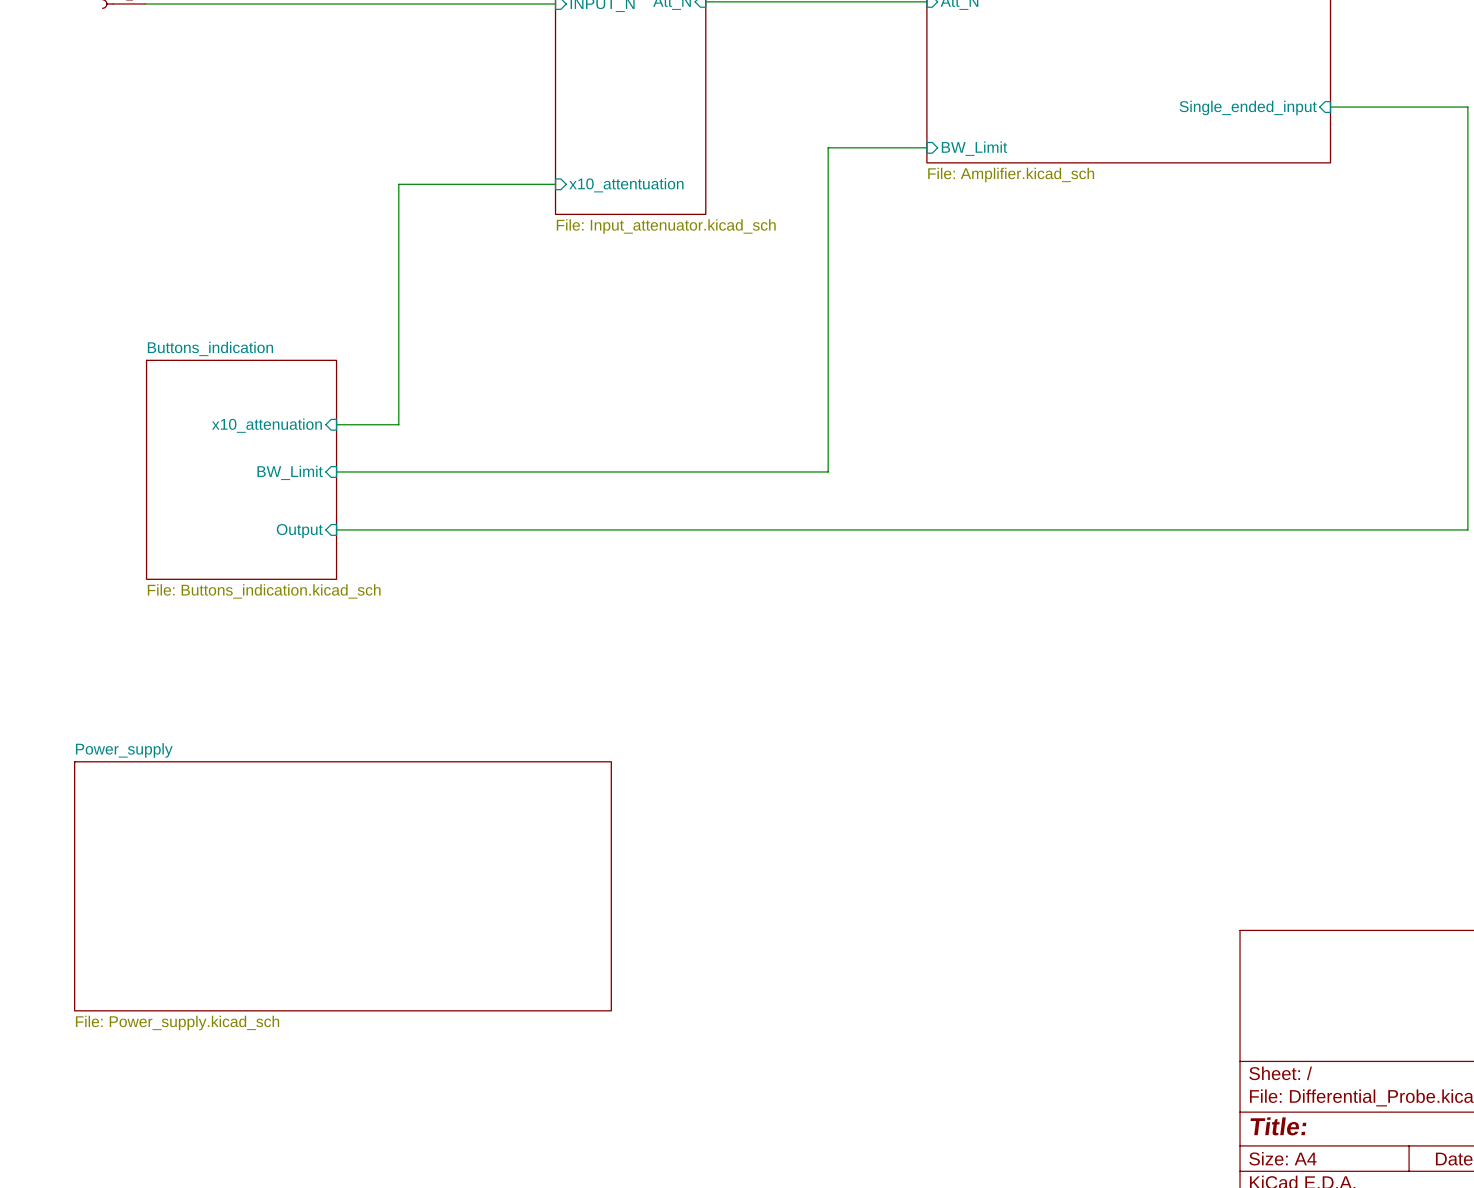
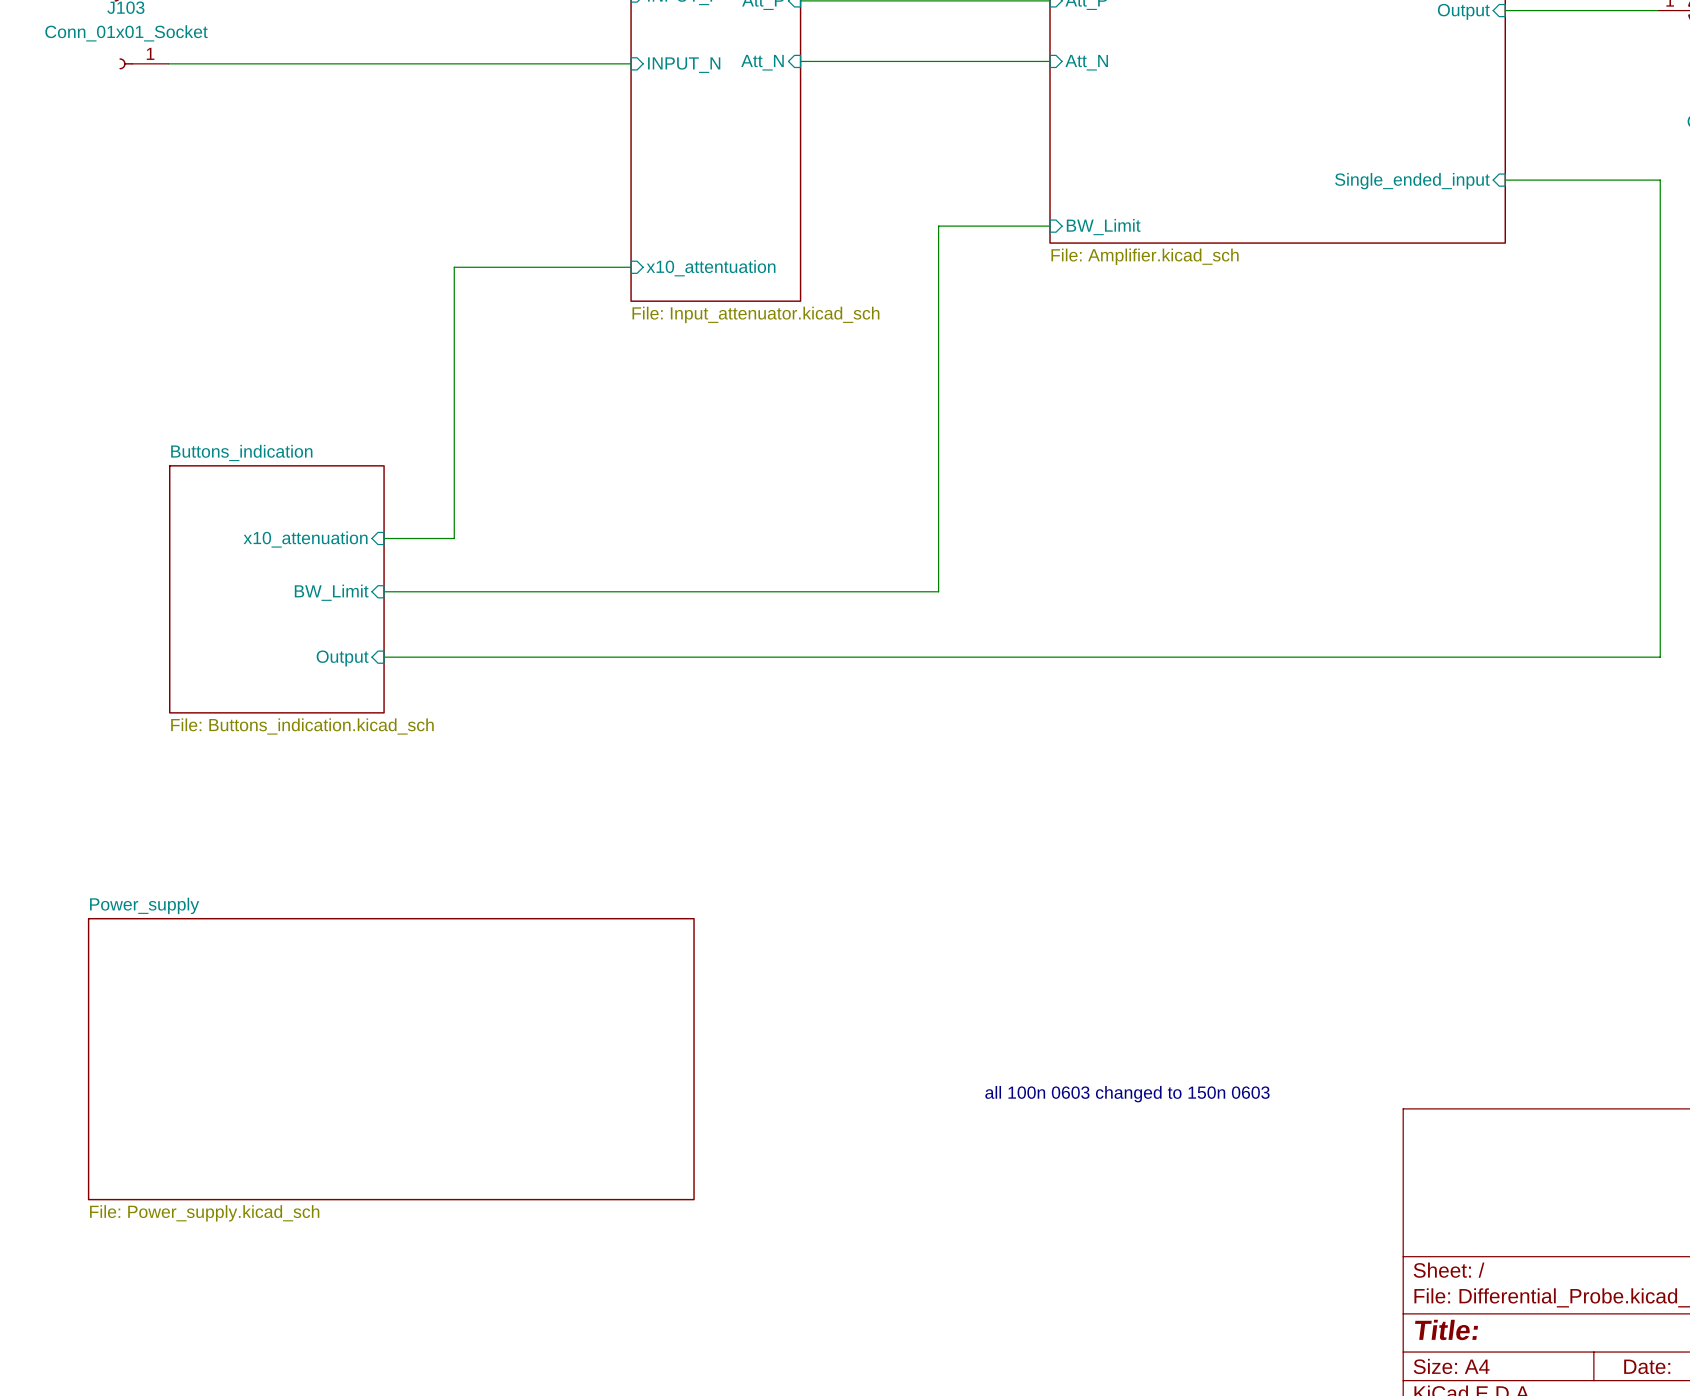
text: none -> all 100n 0603 changed to 150n 0603 (1127, 1094)

